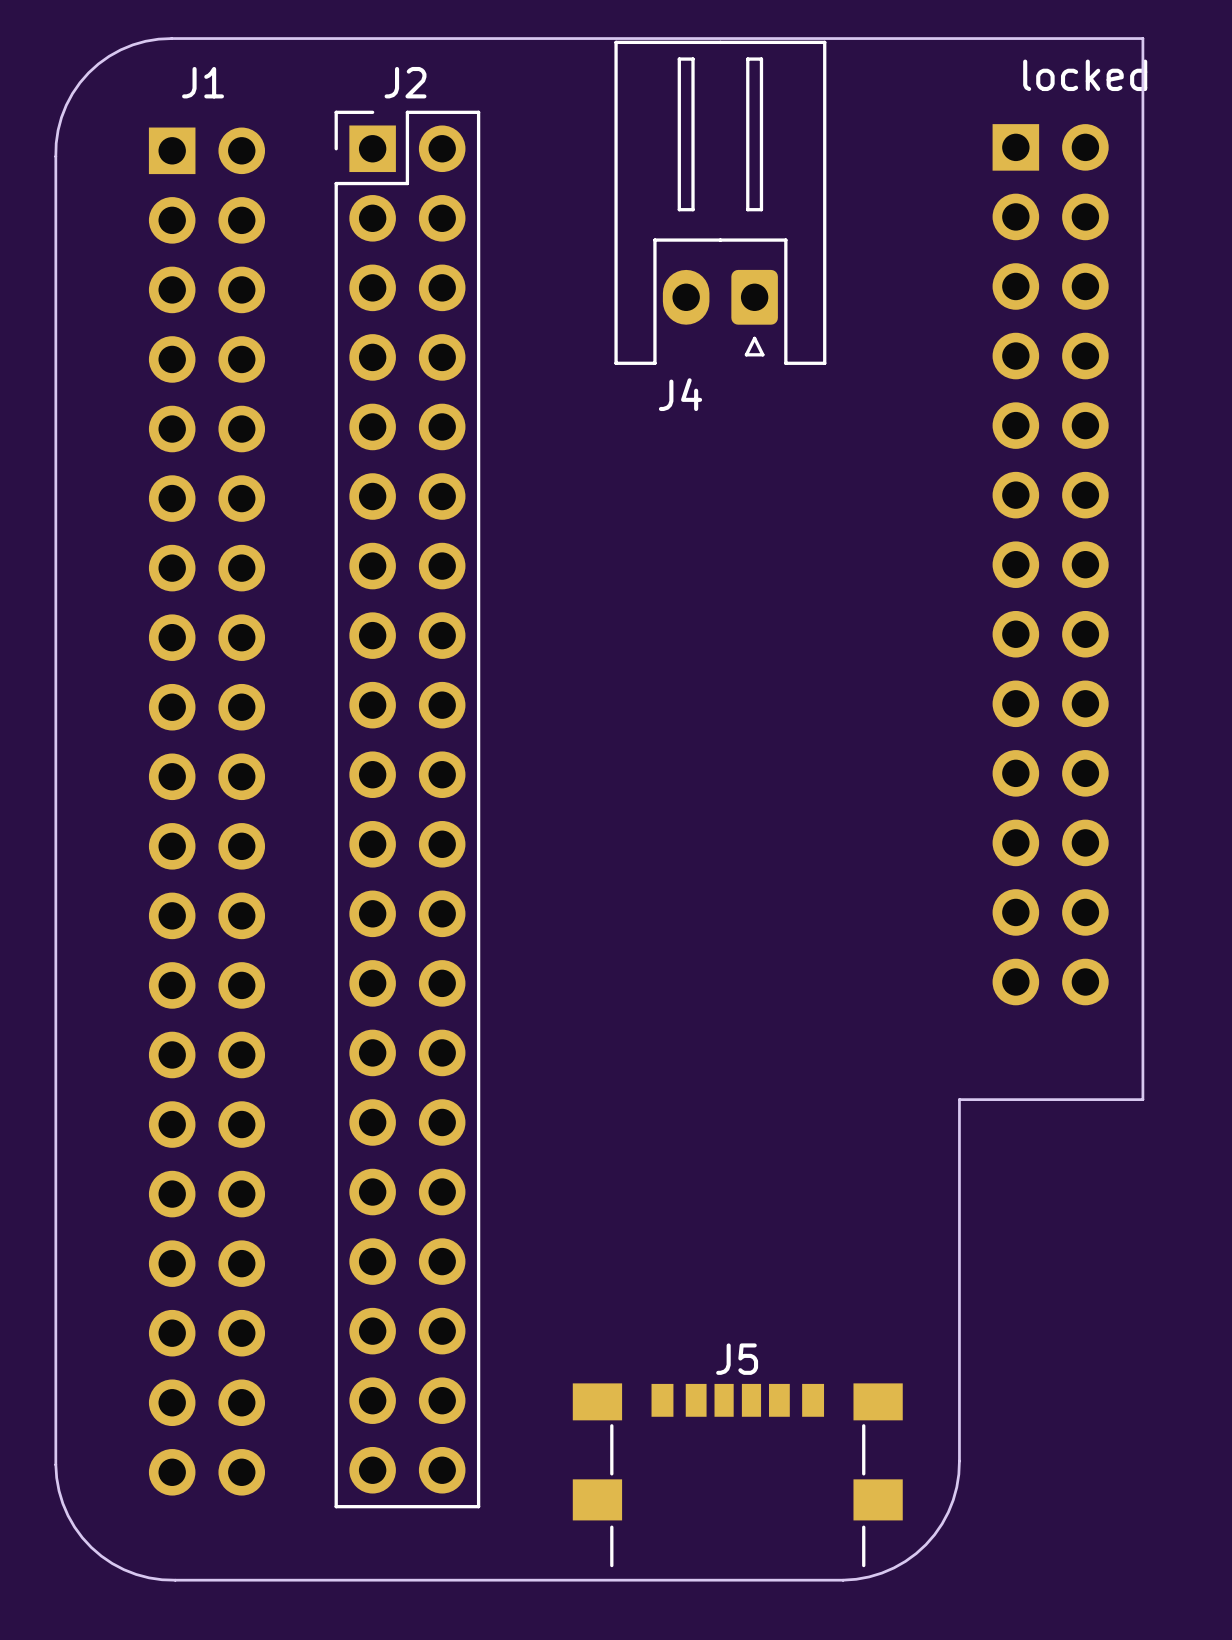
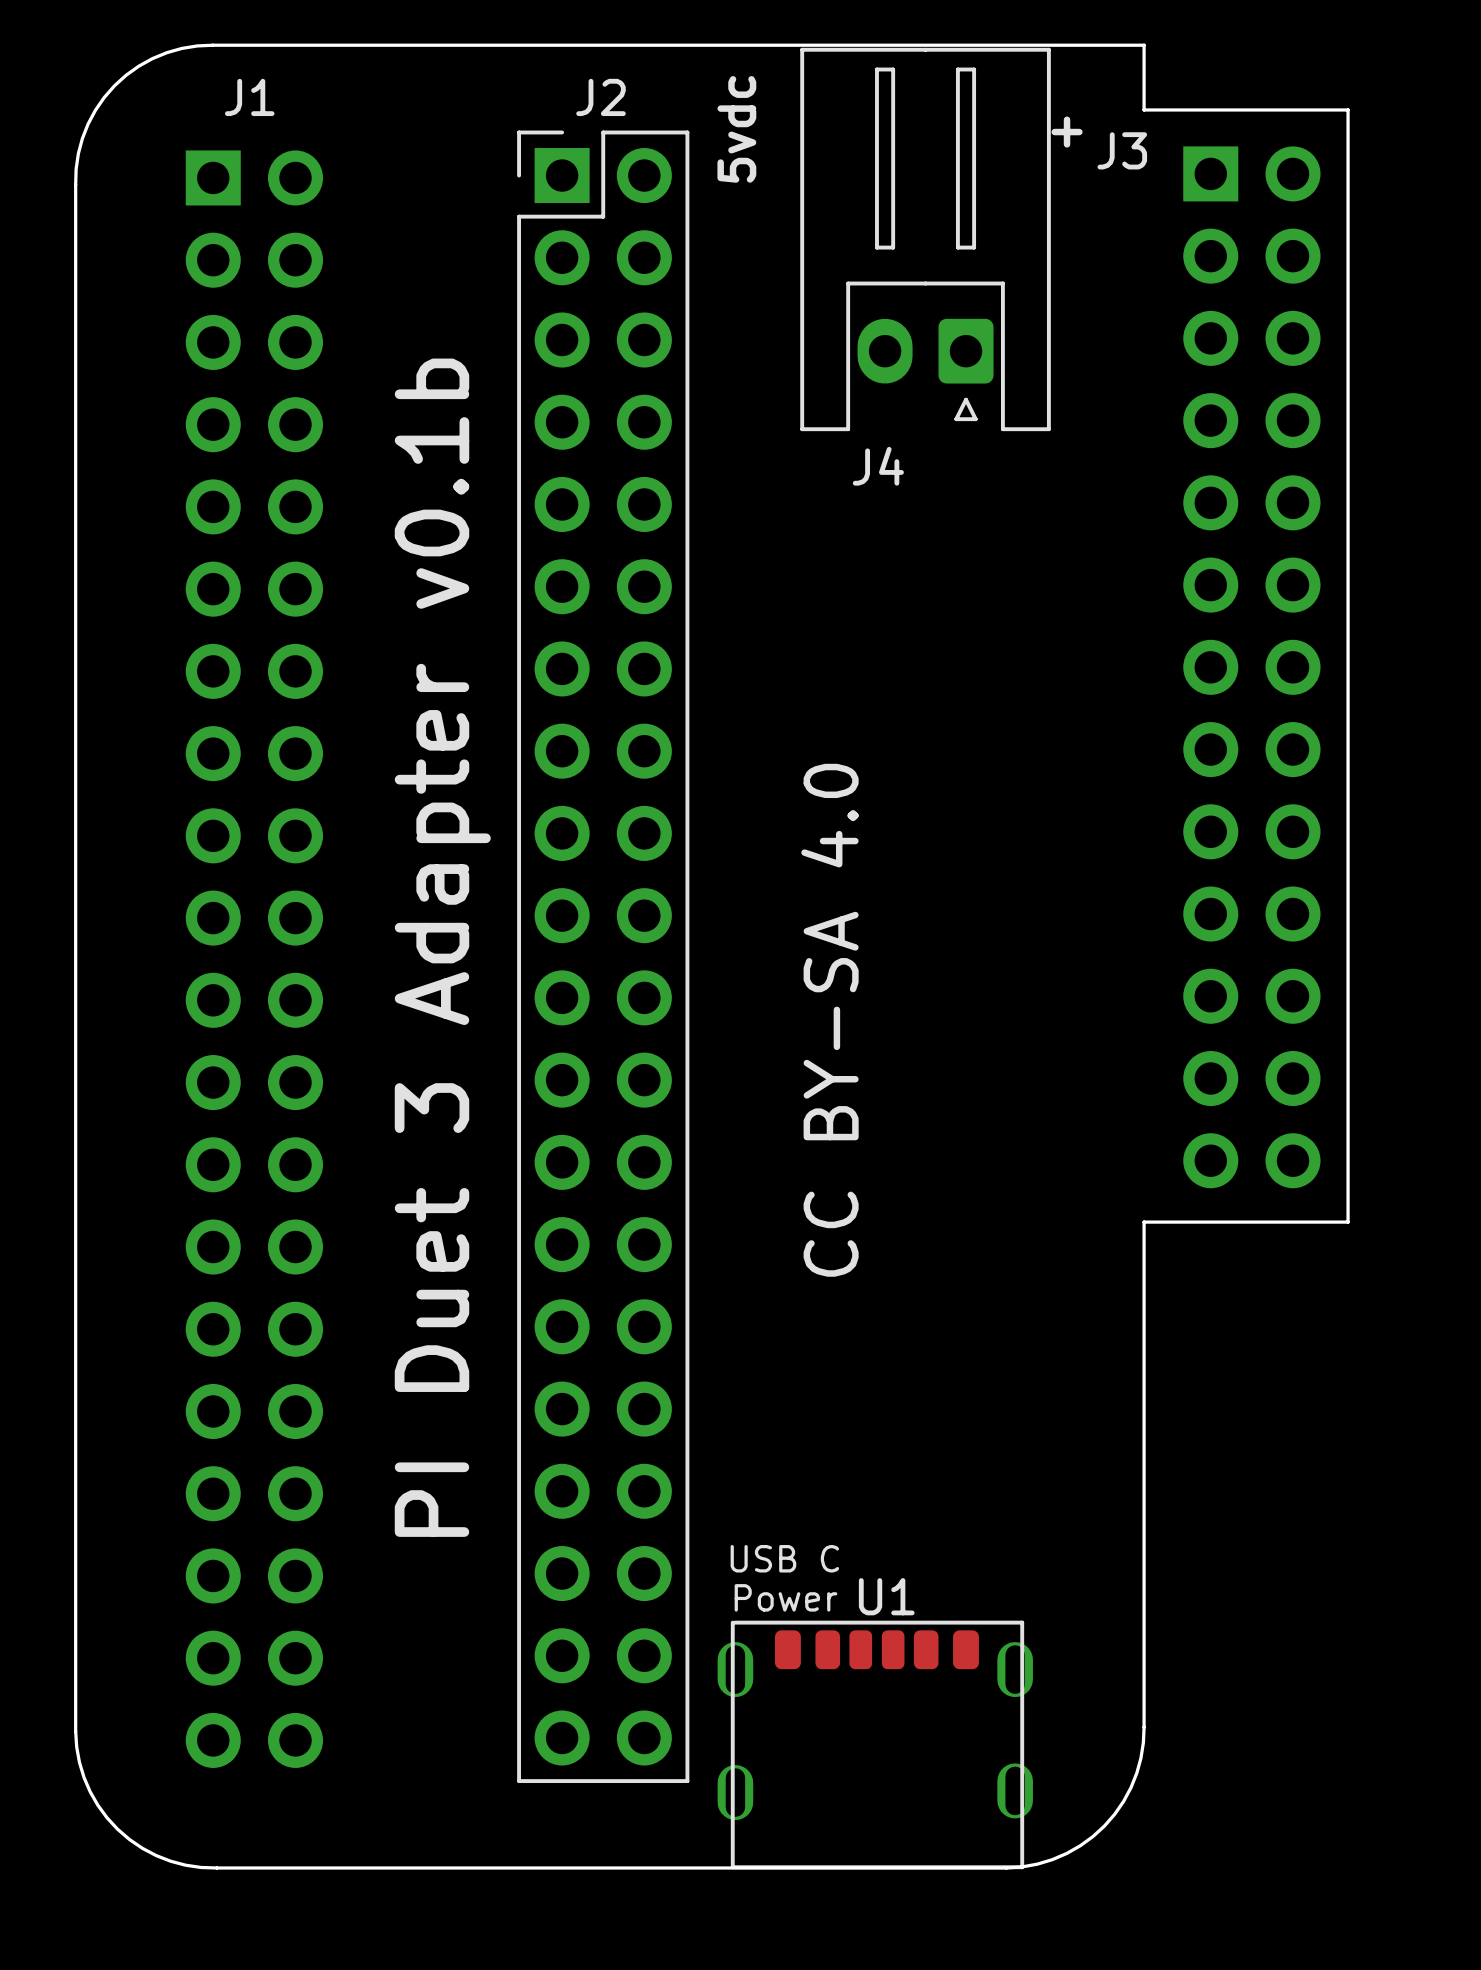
board edge: (959, 38) (1142, 38) (1142, 1099) (959, 1099) -> (1144, 45) (1144, 109) (1348, 109) (1348, 1222) (1144, 1222) (1144, 1299)
text: locked (1085, 75) -> none
text: none -> 5vdc (736, 129)
text: none -> + (1067, 132)
J3 name: none -> J3 (1122, 150)
J4 position: (720, 202) -> (925, 239)
text: none -> PI Duet 3 Adapter v0.1b (442, 947)
J2 position: (407, 809) -> (603, 956)
text: none -> CC BY-SA 4.0 (829, 1020)
text: none -> USB C (784, 1558)
text: none -> Power (785, 1597)
J5: (737, 1475) -> none
U1: none -> (875, 1744)

